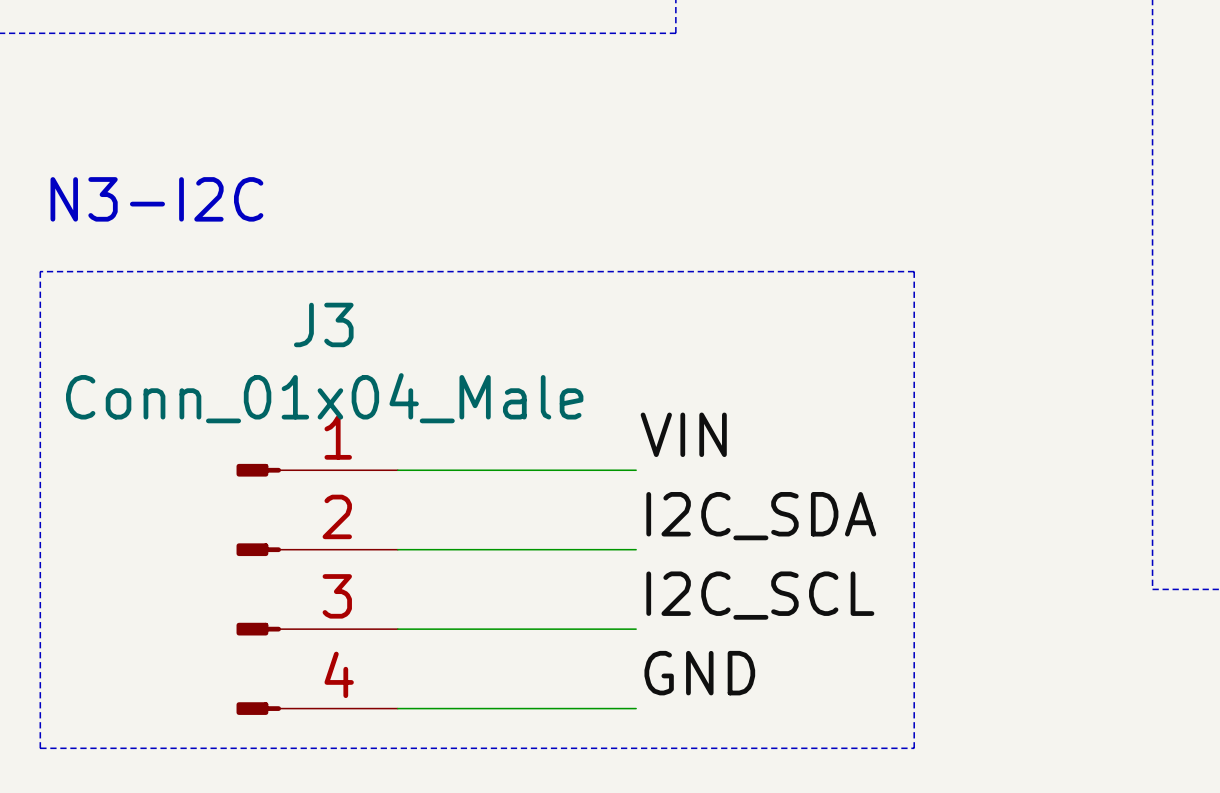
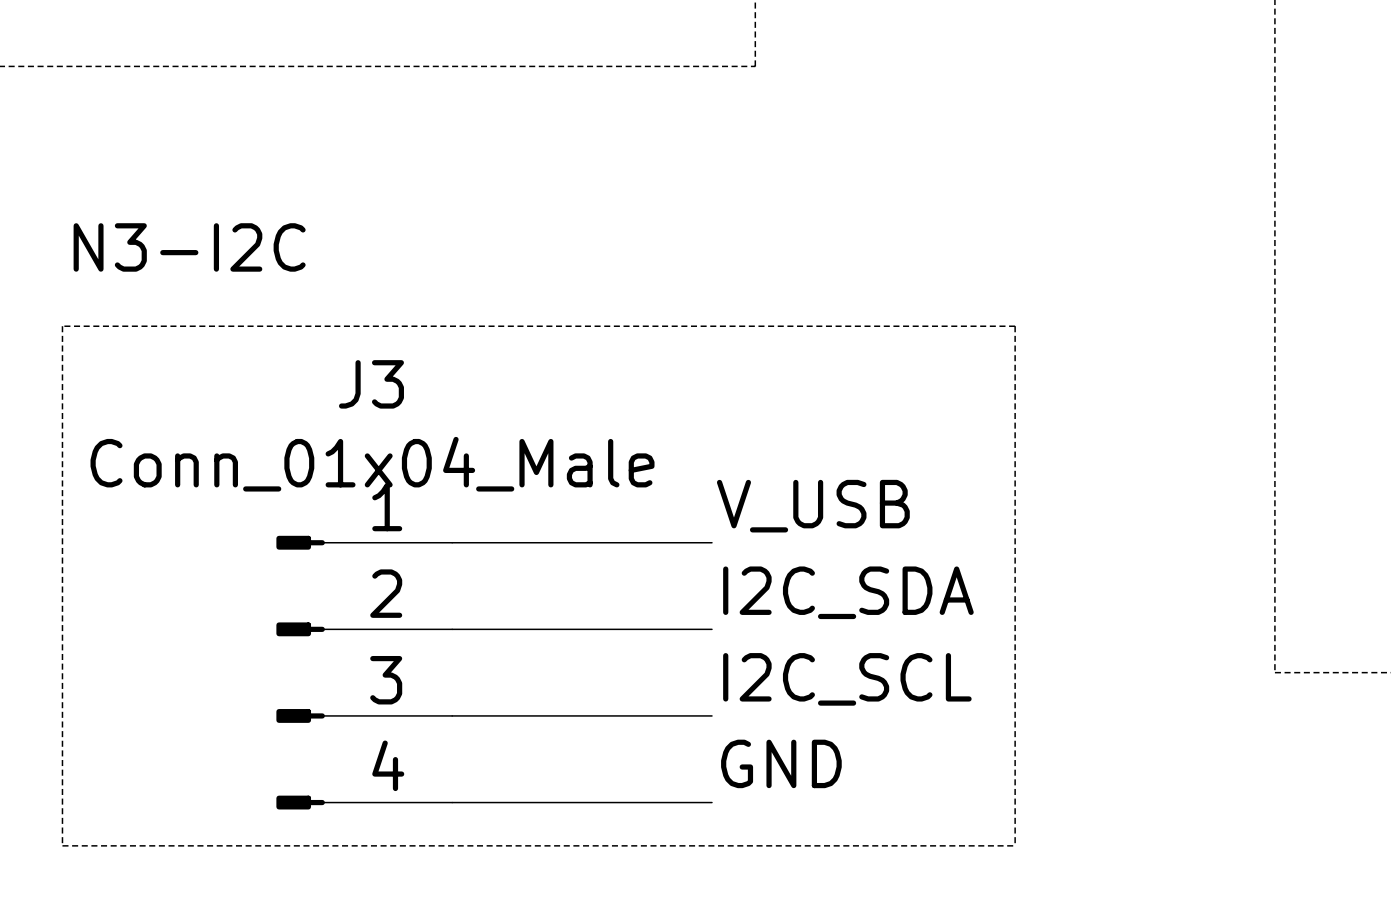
label: VIN (683, 434) -> V_USB (813, 506)

